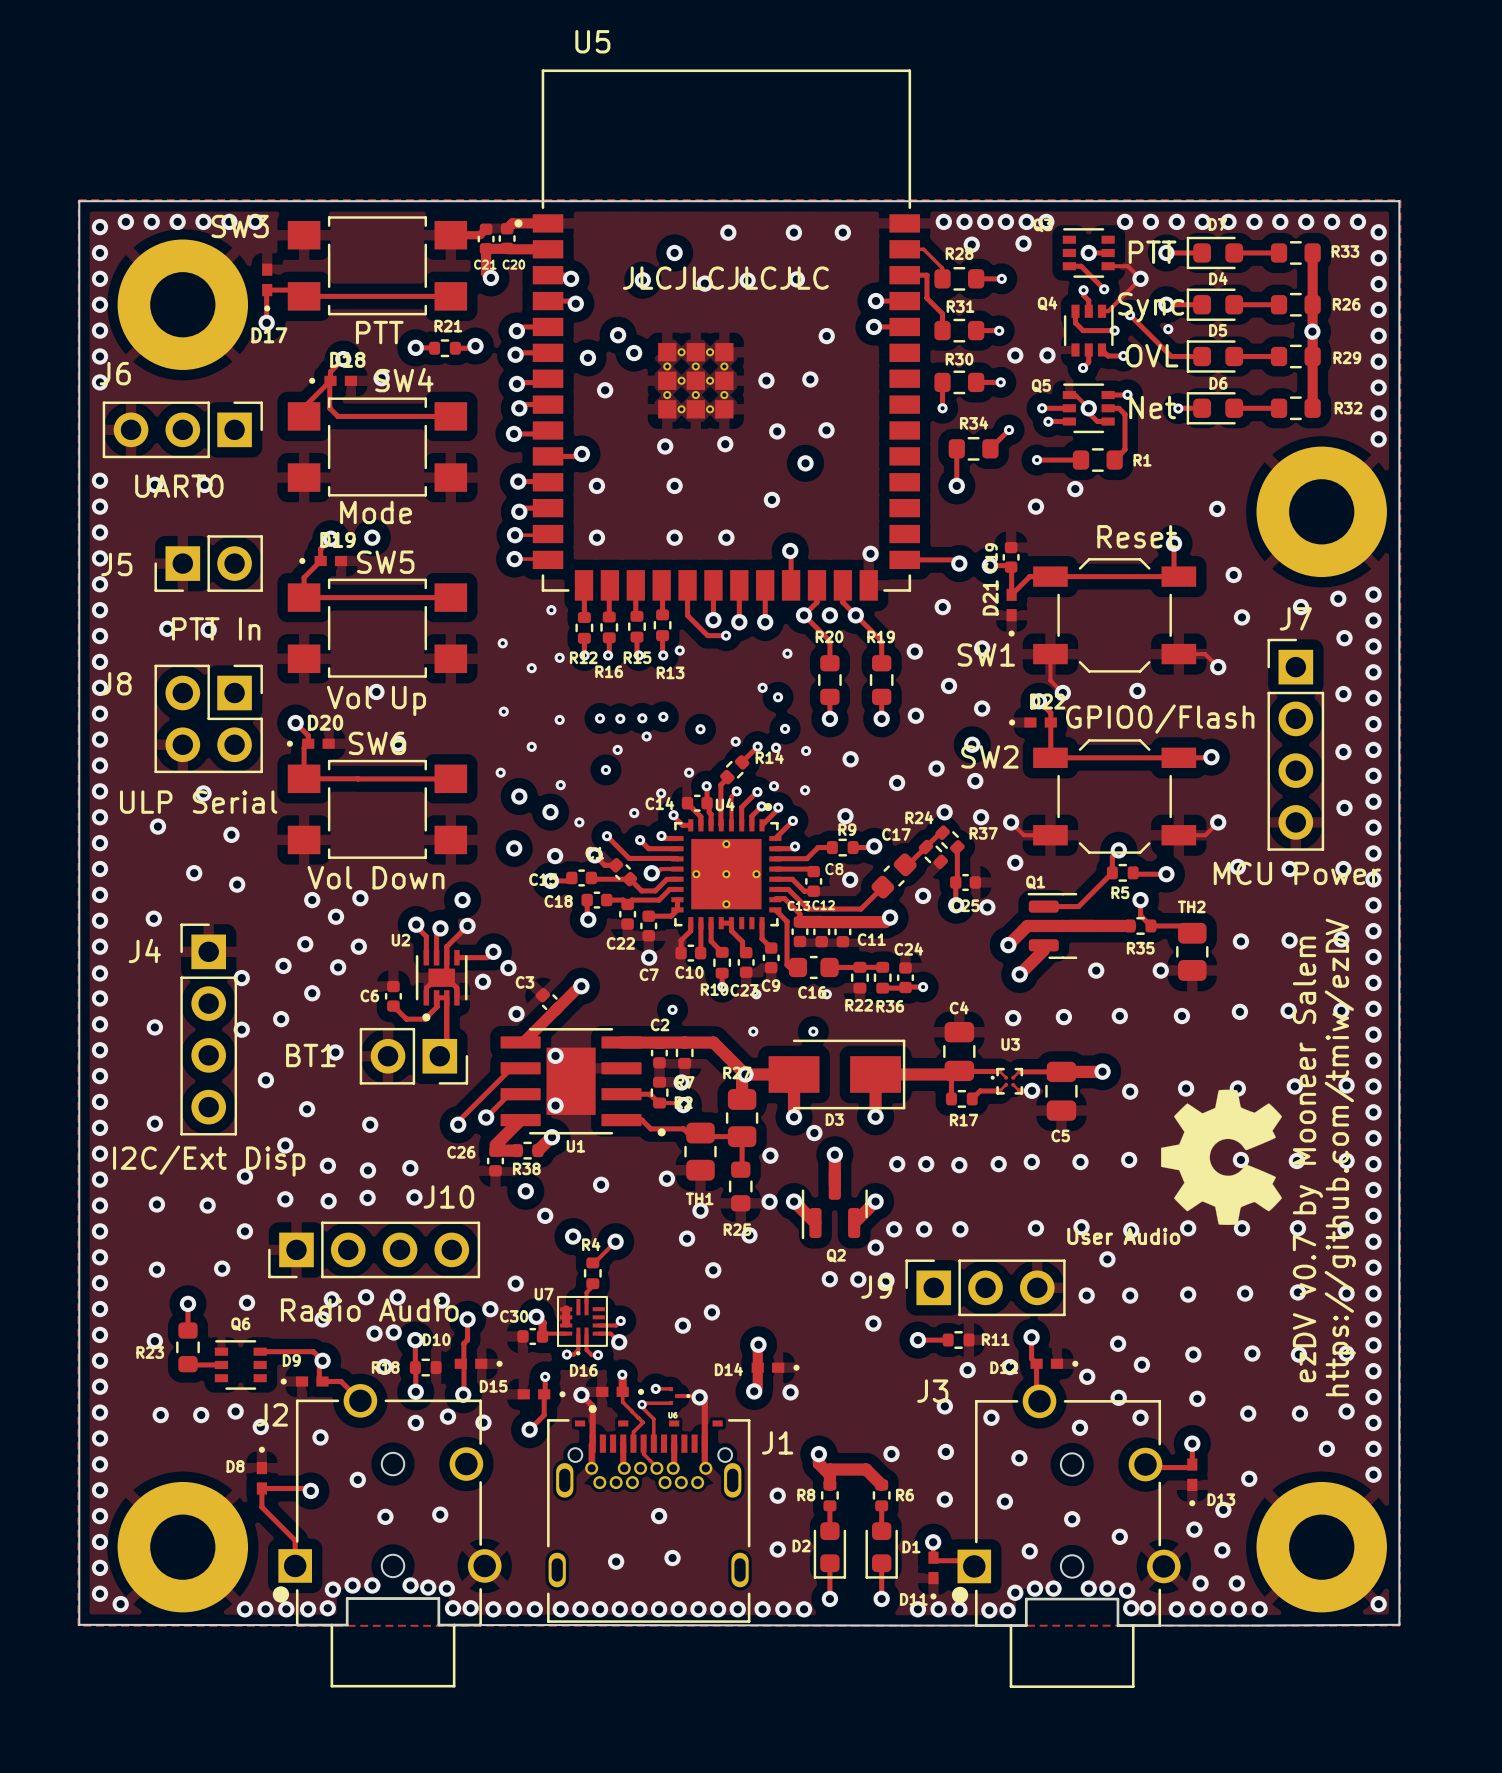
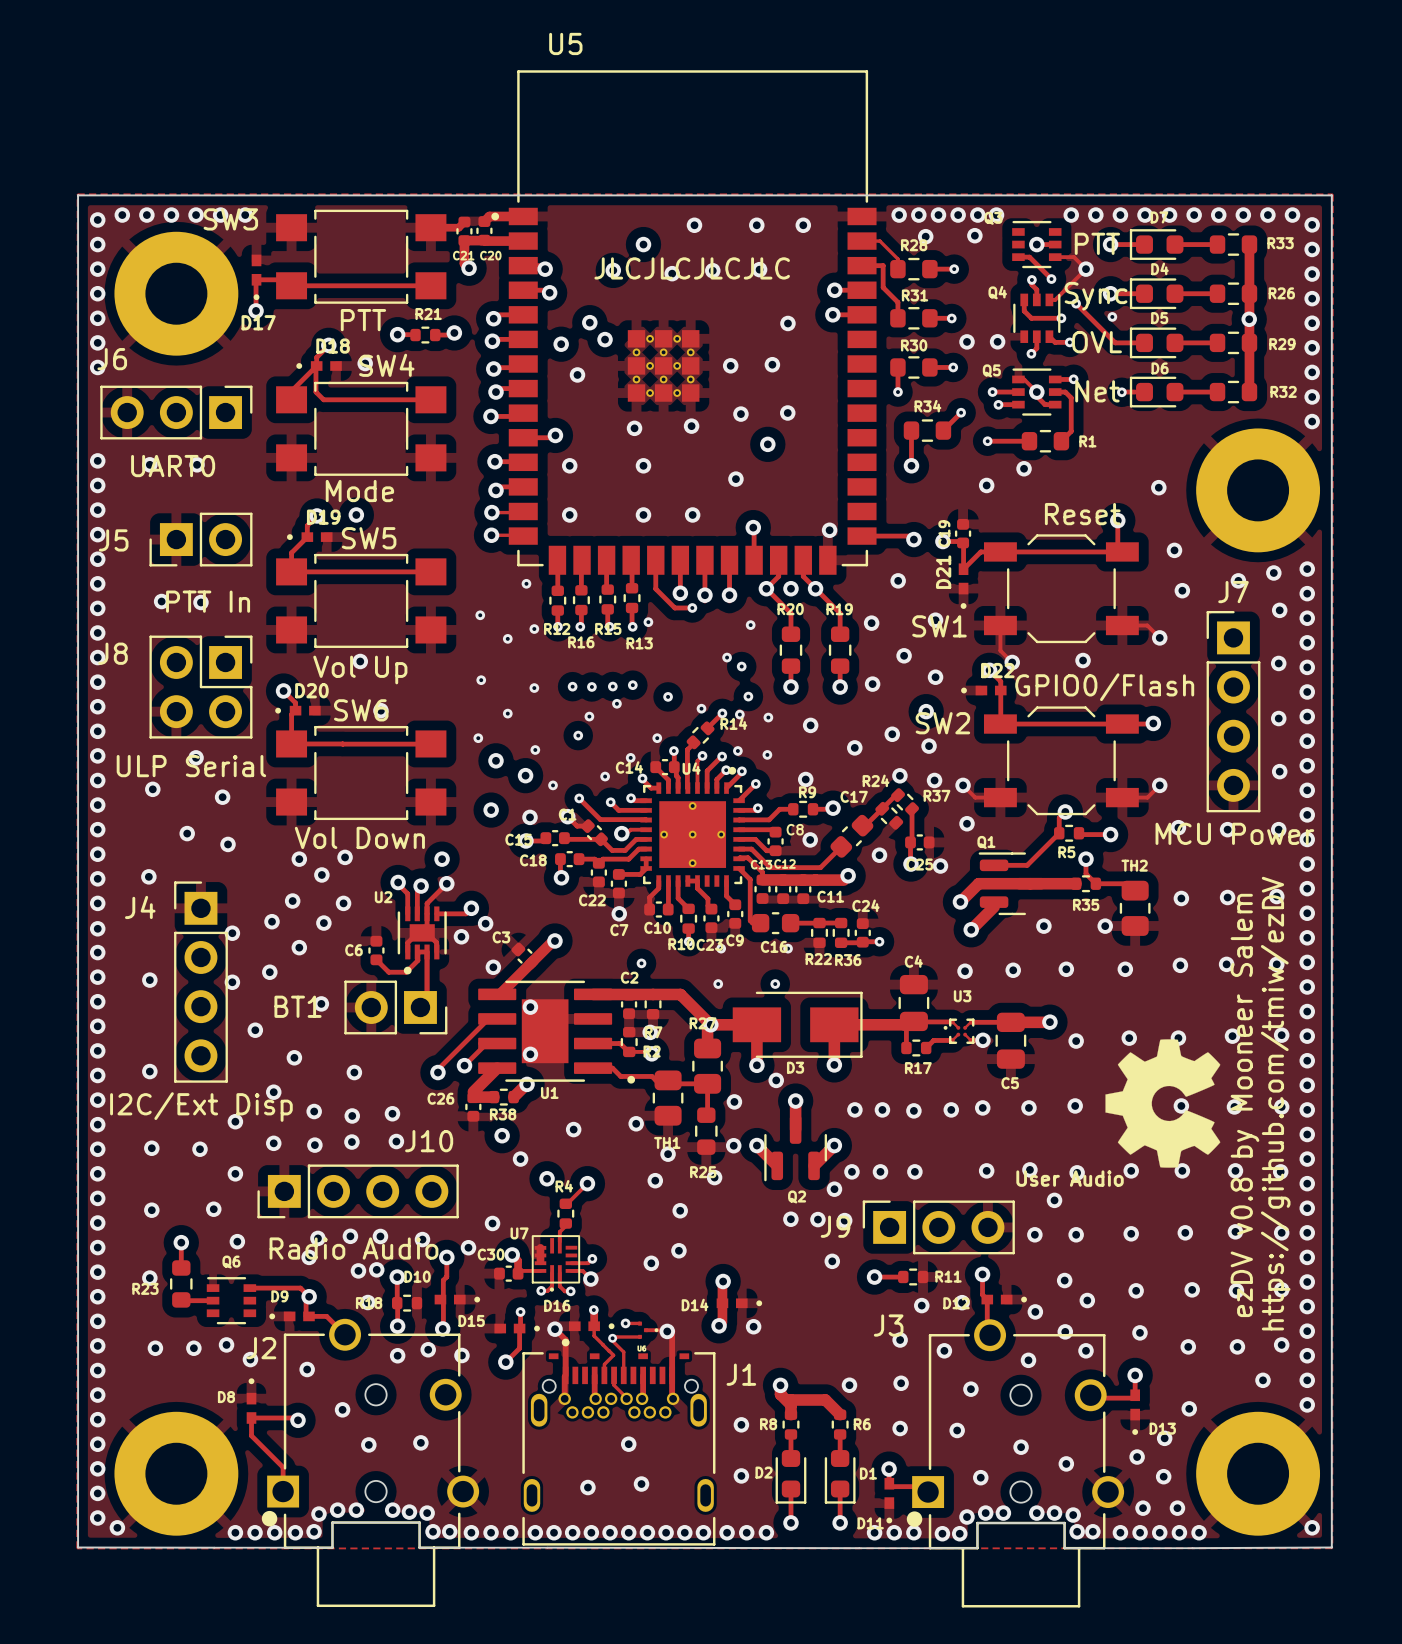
text: ezDV v0.7 by Mooneer Salem (1307, 1159) -> ezDV v0.8 by Mooneer Salem (1245, 1105)

